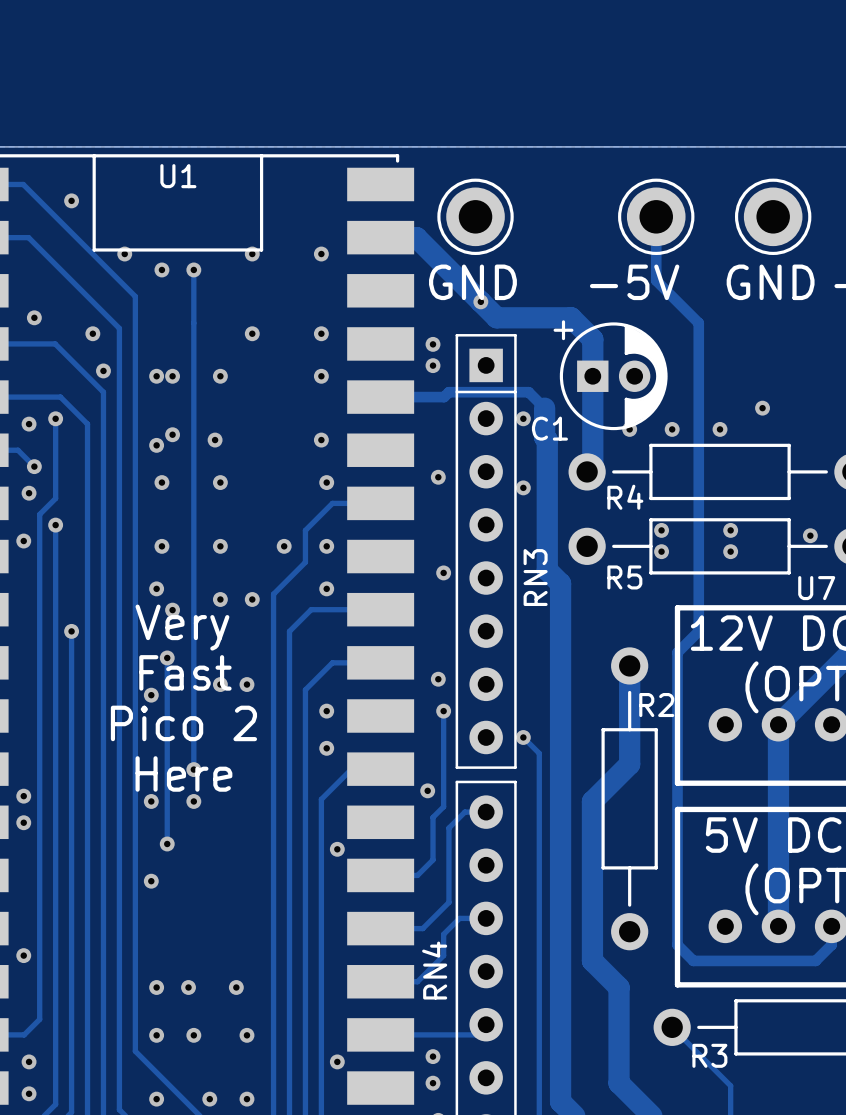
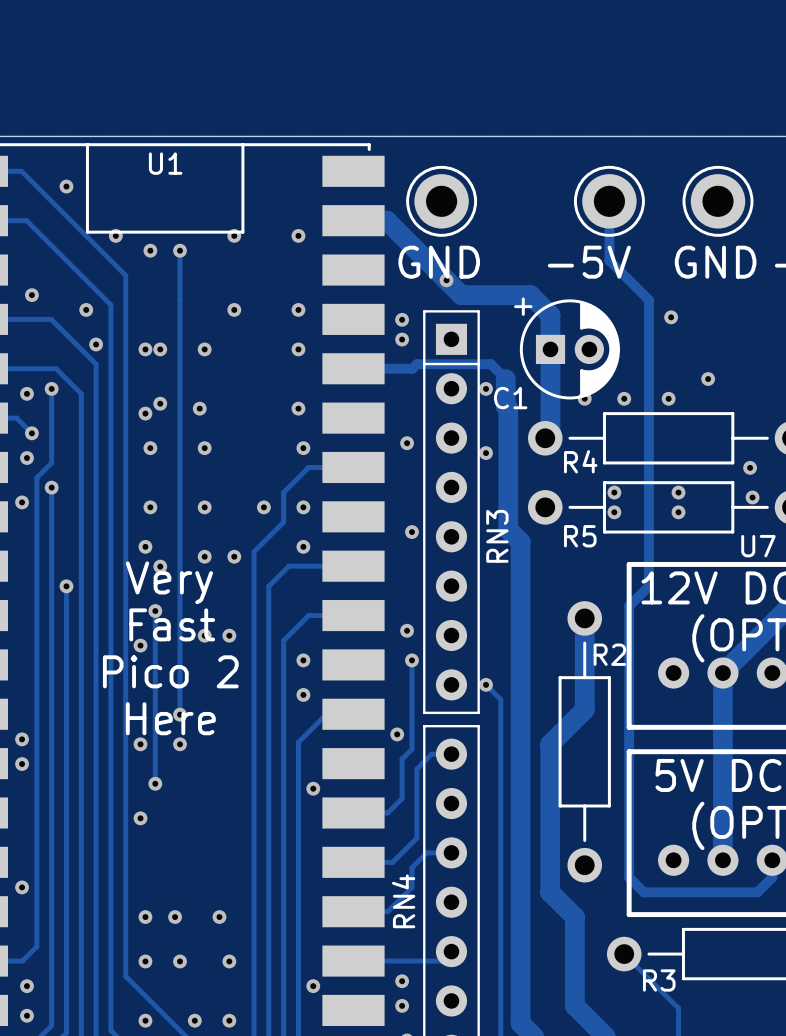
via: none -> (671, 317)
via: none -> (750, 467)

